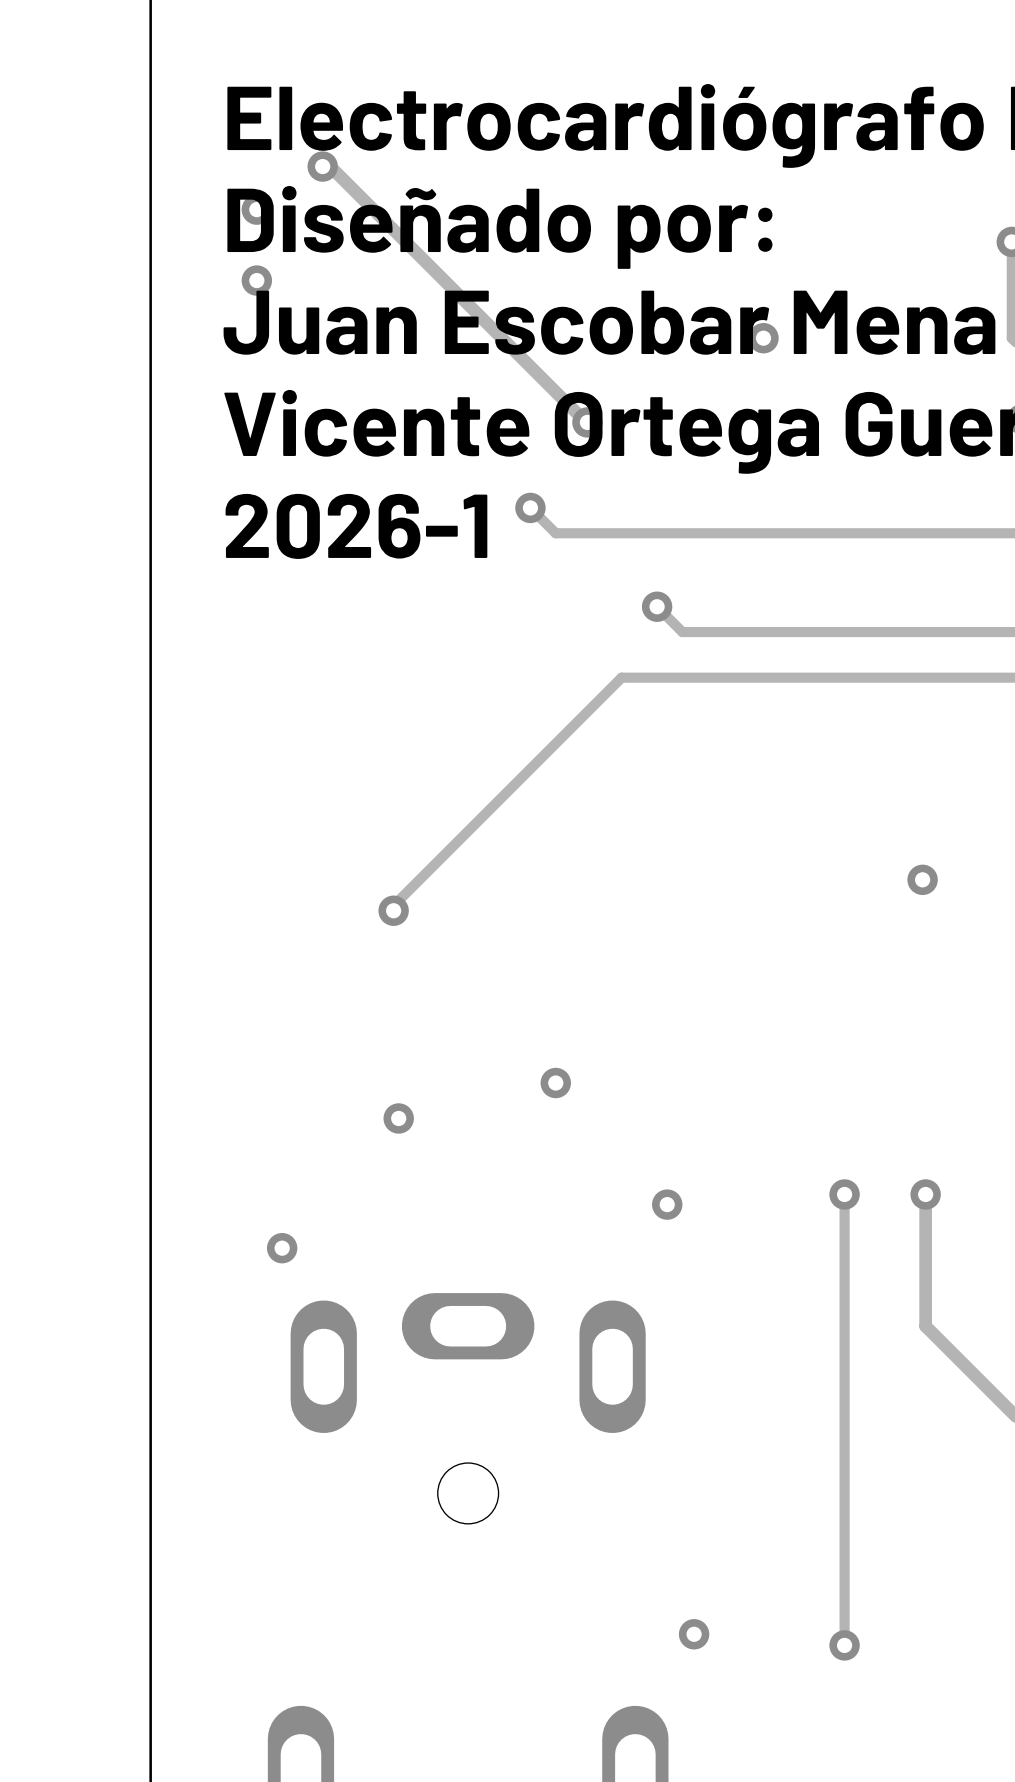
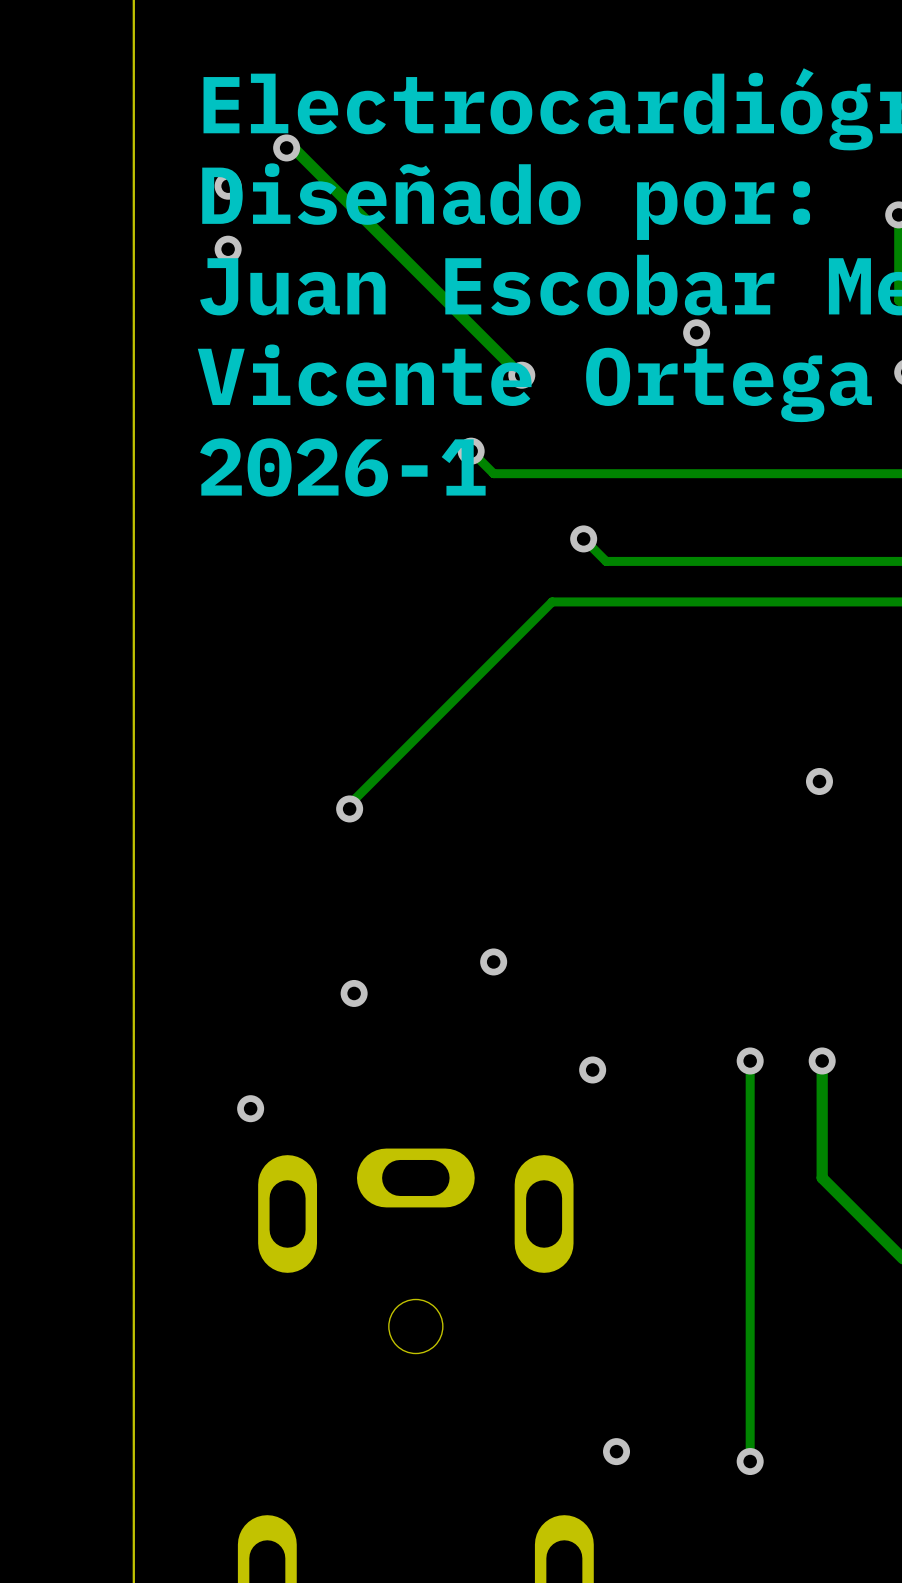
via position: (763, 338) -> (696, 332)

